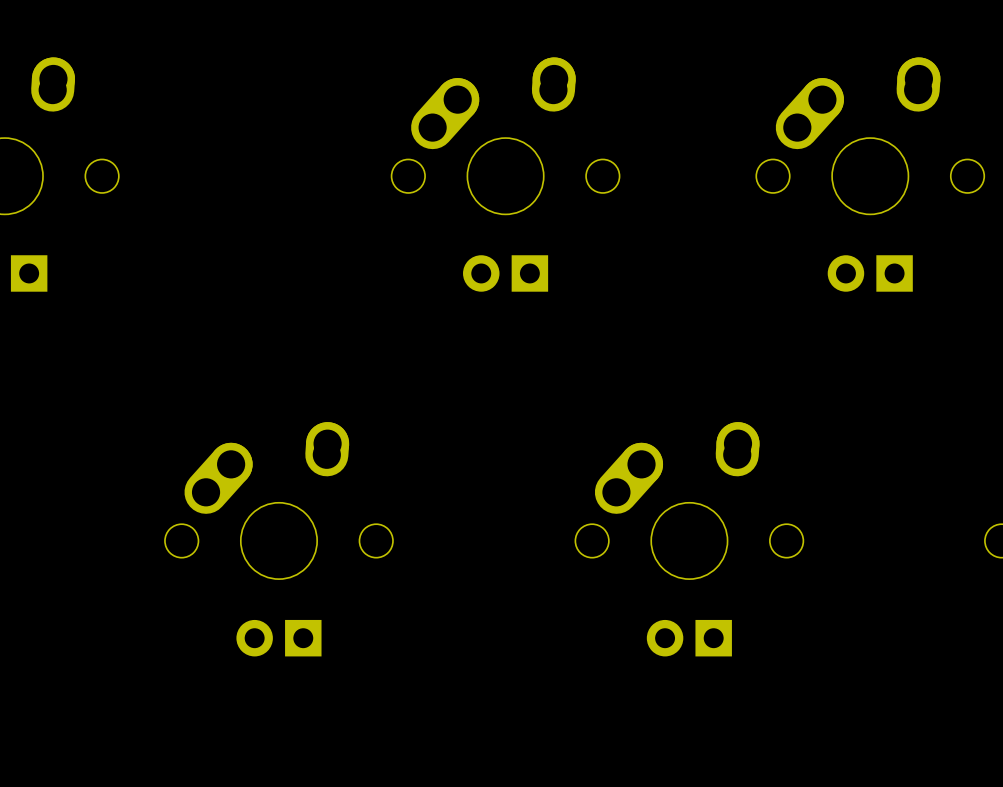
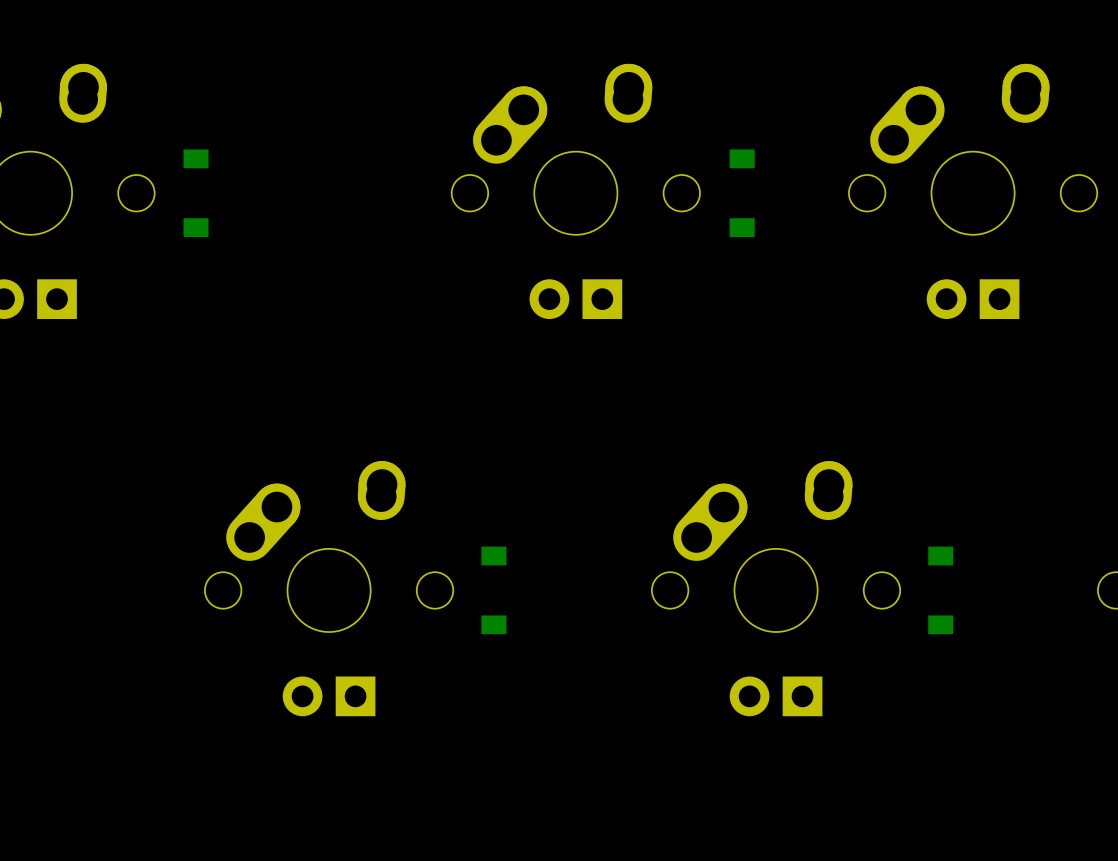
part: none -> (196, 193)
part: none -> (742, 193)
part: none -> (493, 590)
part: none -> (940, 590)

